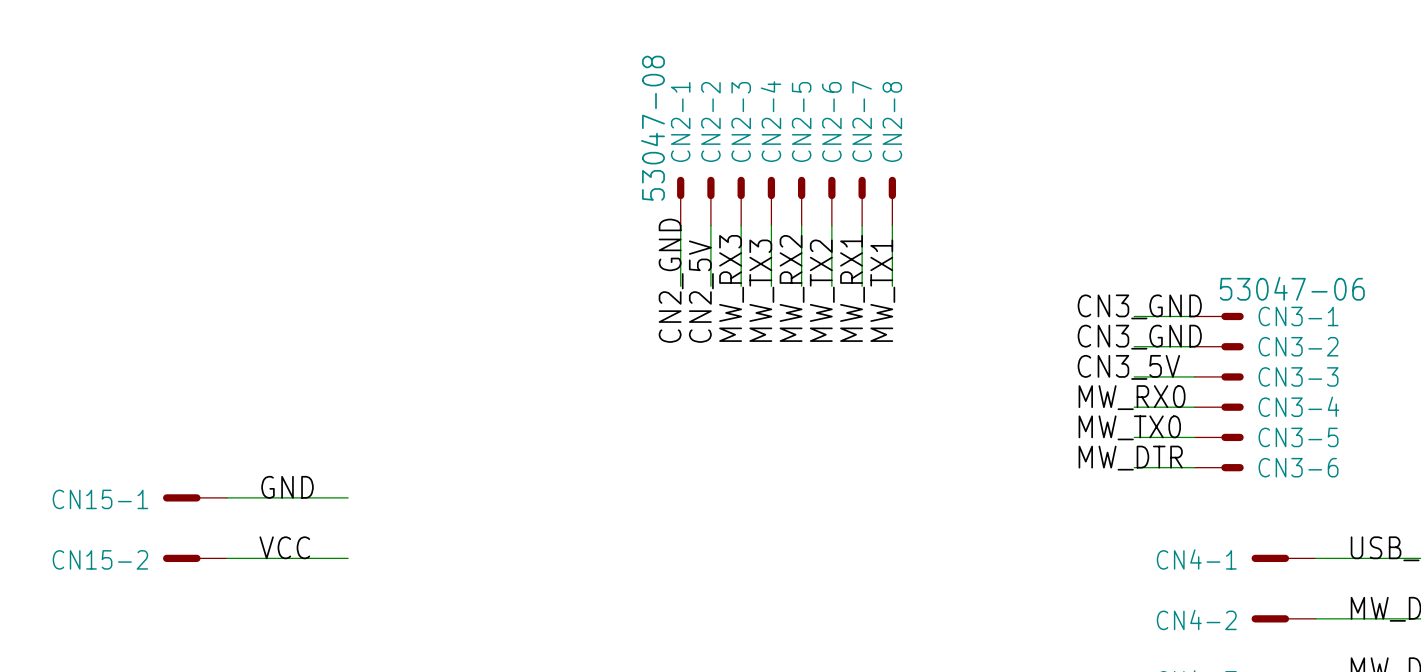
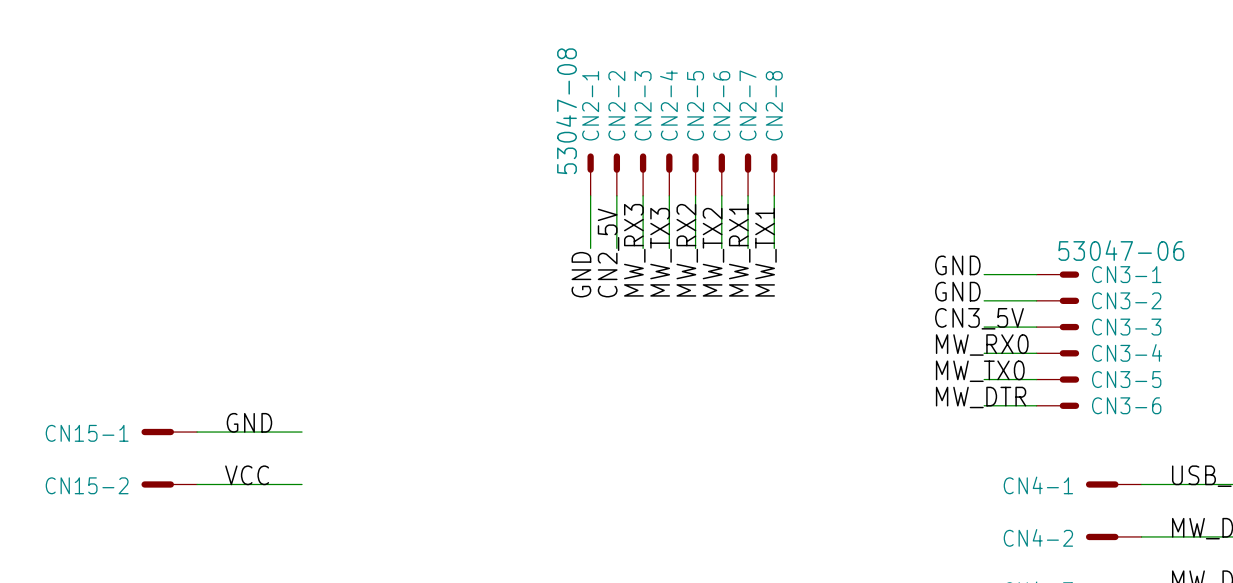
label: CN2_GND (671, 280) -> GND (581, 274)
label: CN3_GND (1139, 306) -> GND (957, 265)
label: CN3_GND (1139, 337) -> GND (957, 291)

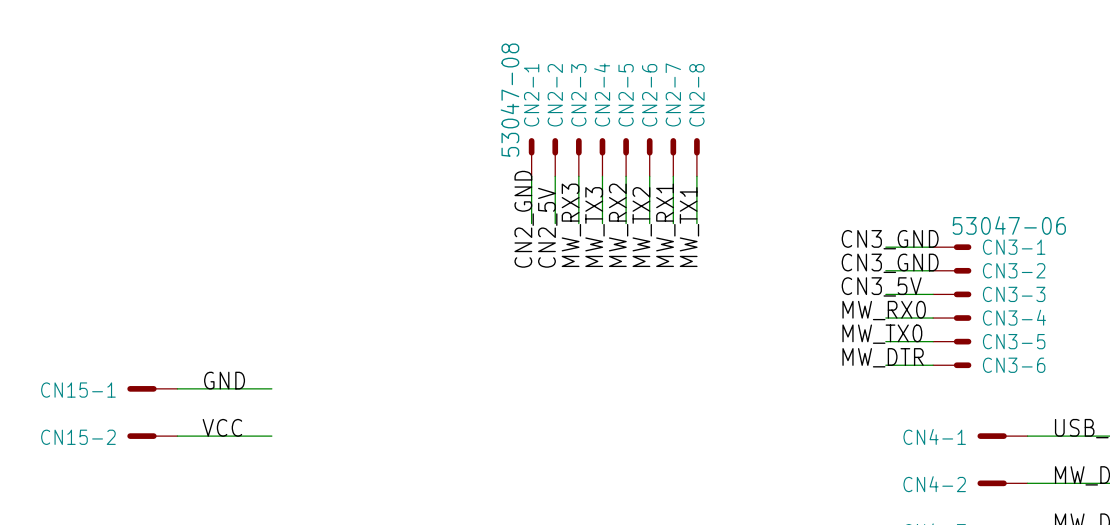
label: GND (957, 265) -> CN3_GND (890, 239)
label: GND (581, 274) -> CN2_GND (524, 219)
label: GND (957, 291) -> CN3_GND (890, 263)

